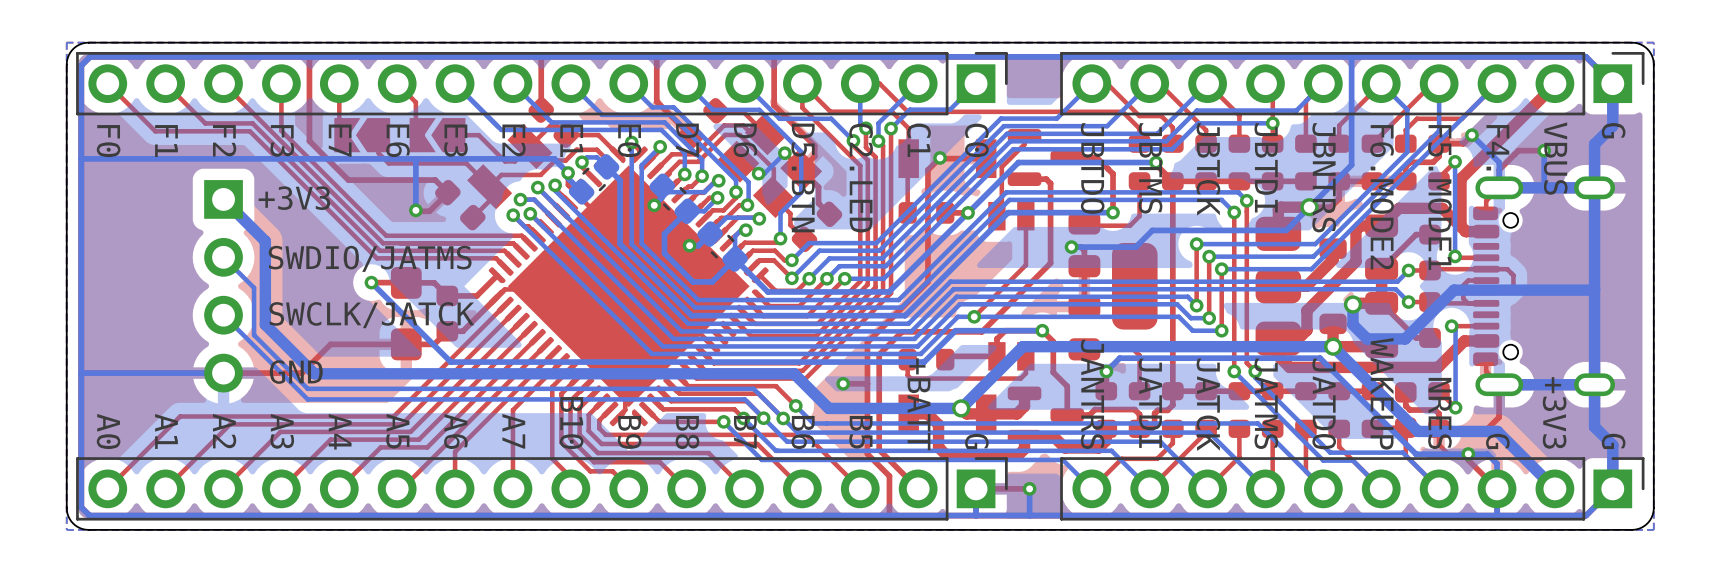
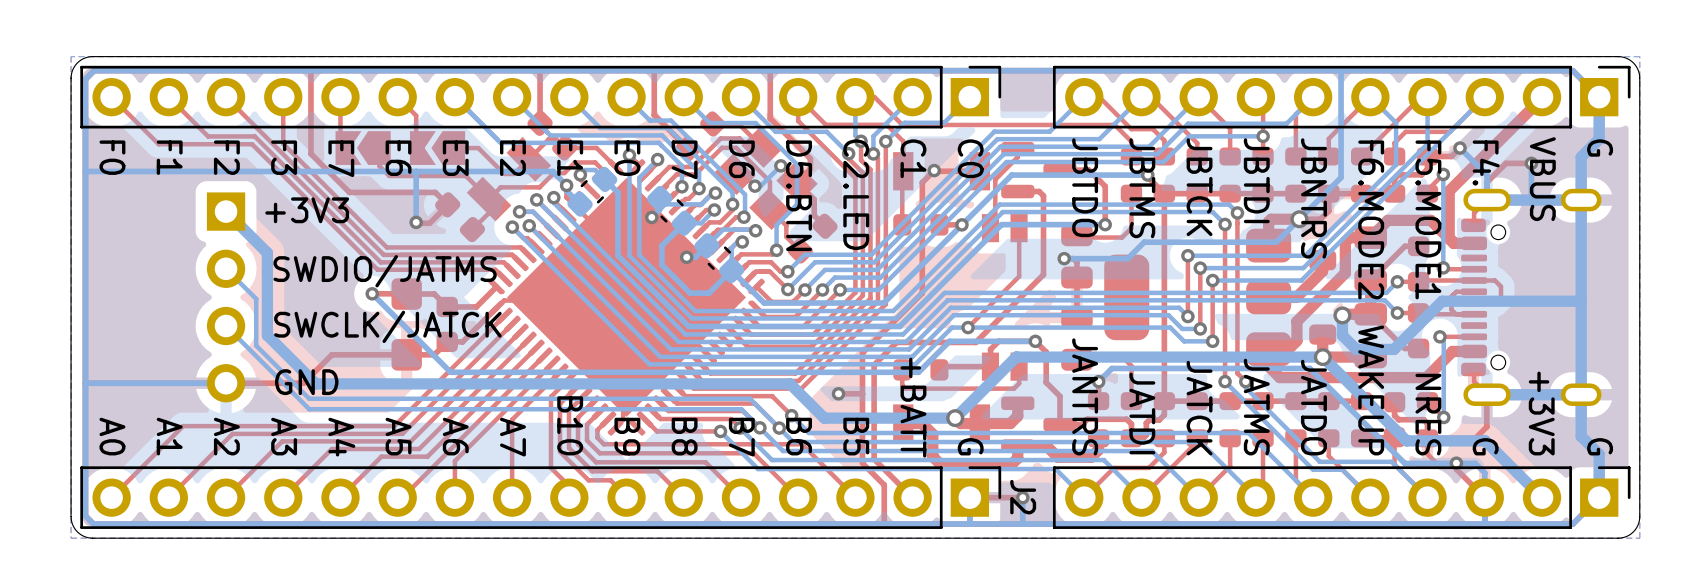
J2 name: none -> J2 (1023, 497)

